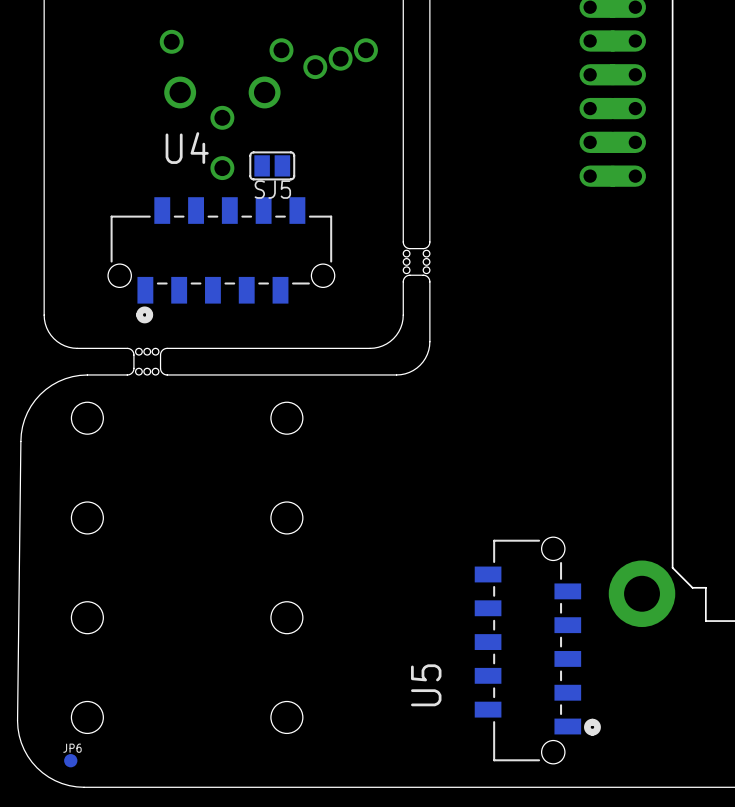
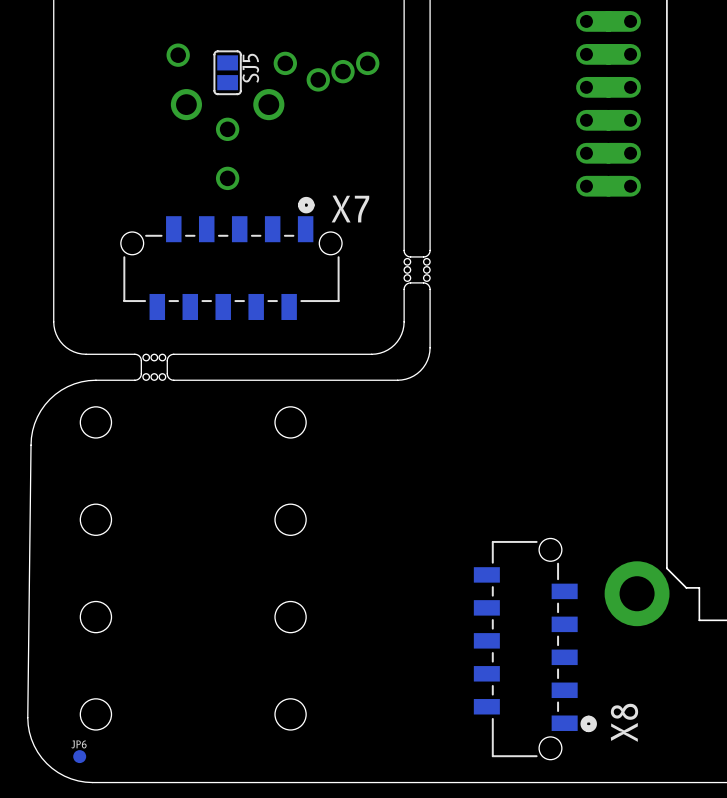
SJ5 rotation: 0° (272, 165) -> 90° clockwise (227, 72)
SJ5 position: (272, 165) -> (227, 72)
SJ5 name position: SJ5 (272, 189) -> SJ5 (250, 68)
X7: none -> (231, 258)
U4: (221, 260) -> none
U5 name: U5 (426, 685) -> X8 (624, 722)

